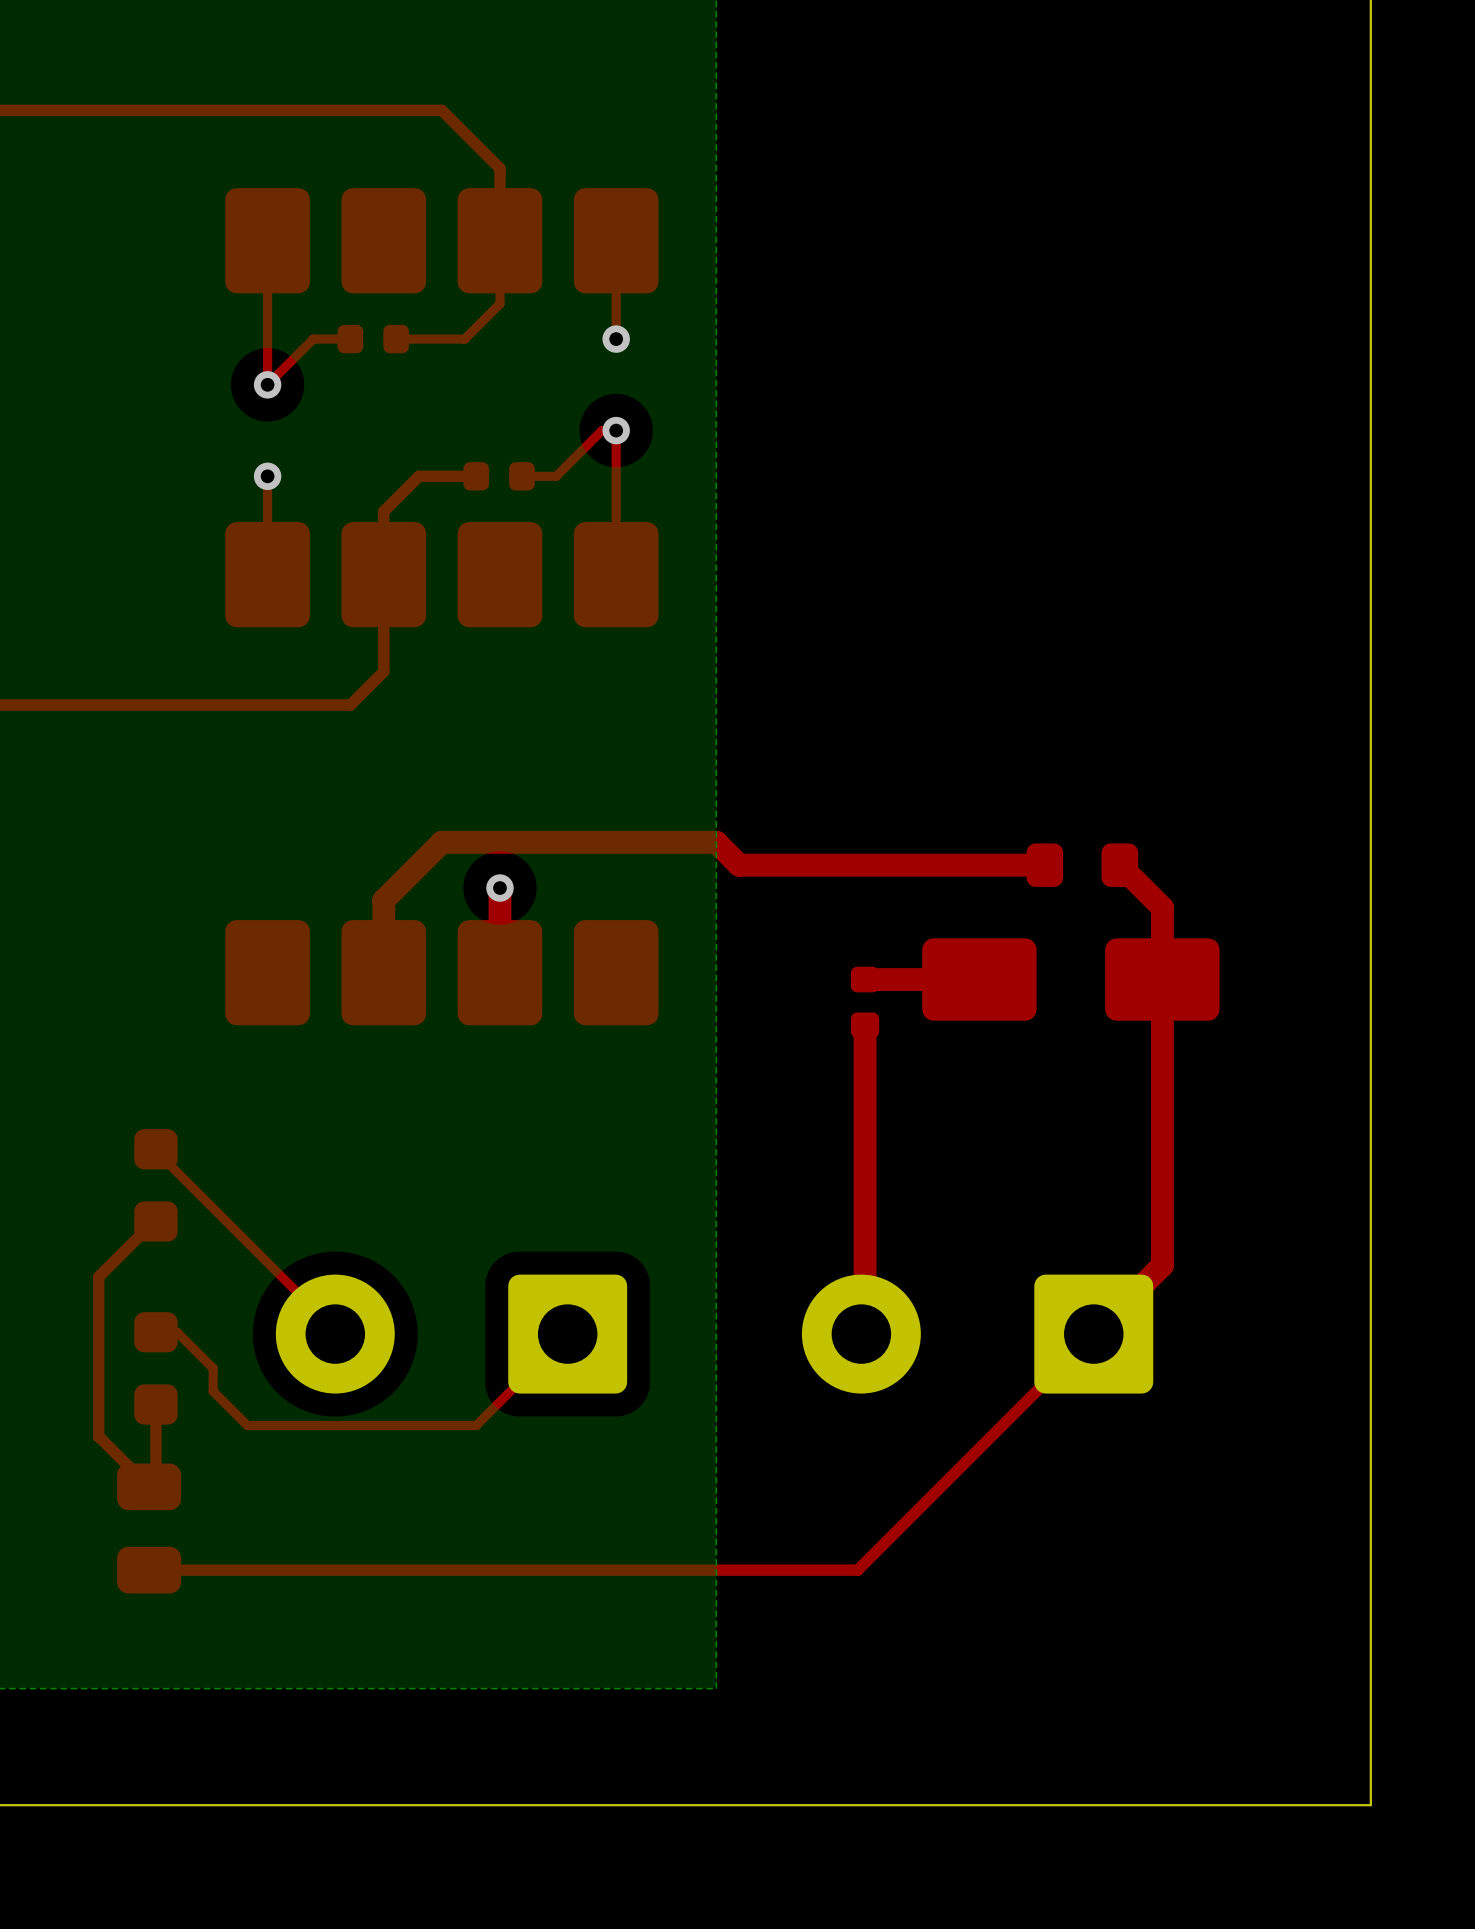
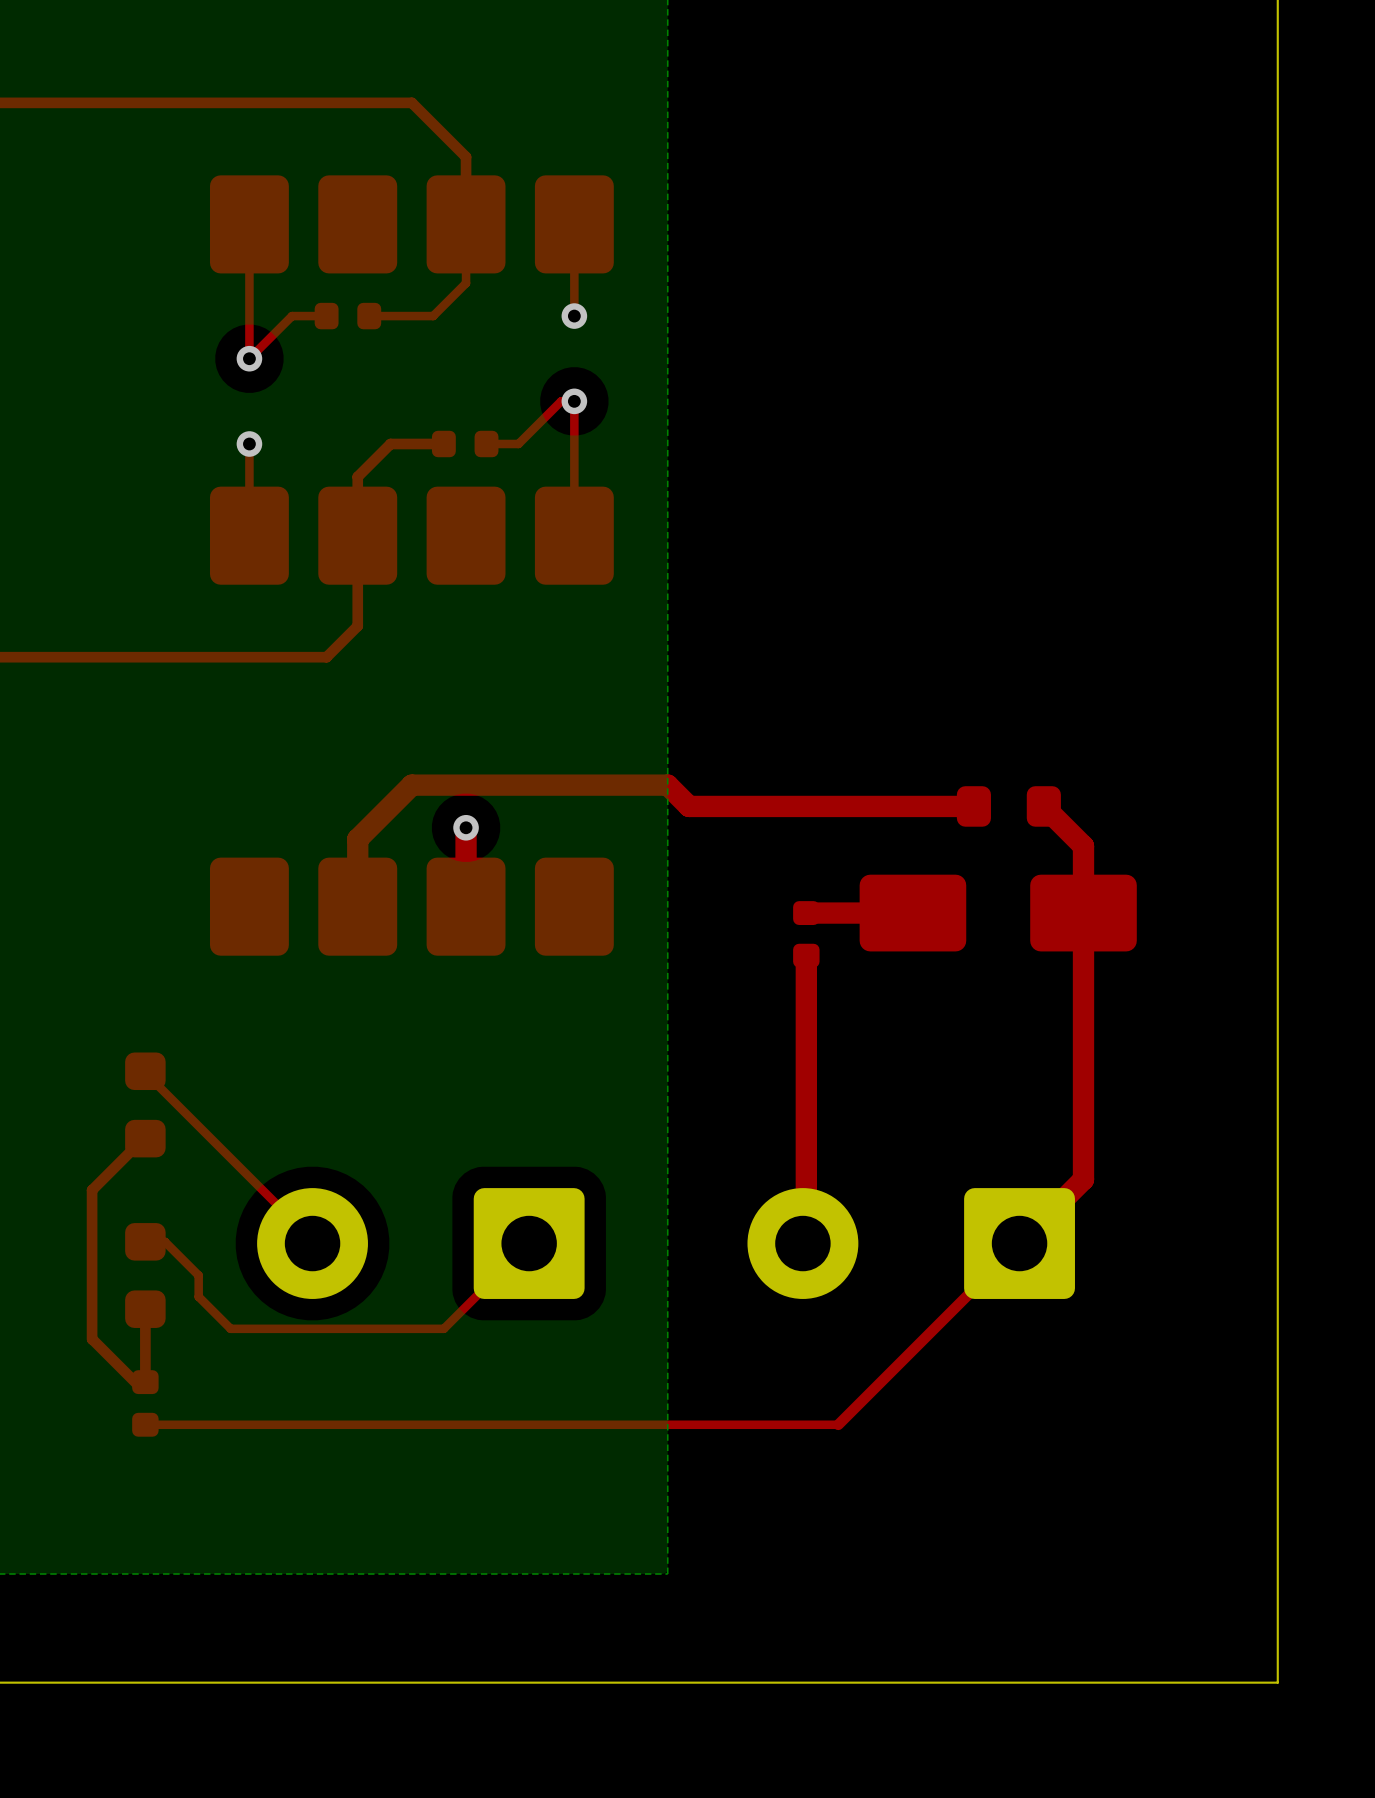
part footprint: [117, 1463, 182, 1594] -> [132, 1370, 159, 1437]
top track: (899, 1528) (857, 1570) (149, 1570) -> (838, 1424) (145, 1424)

